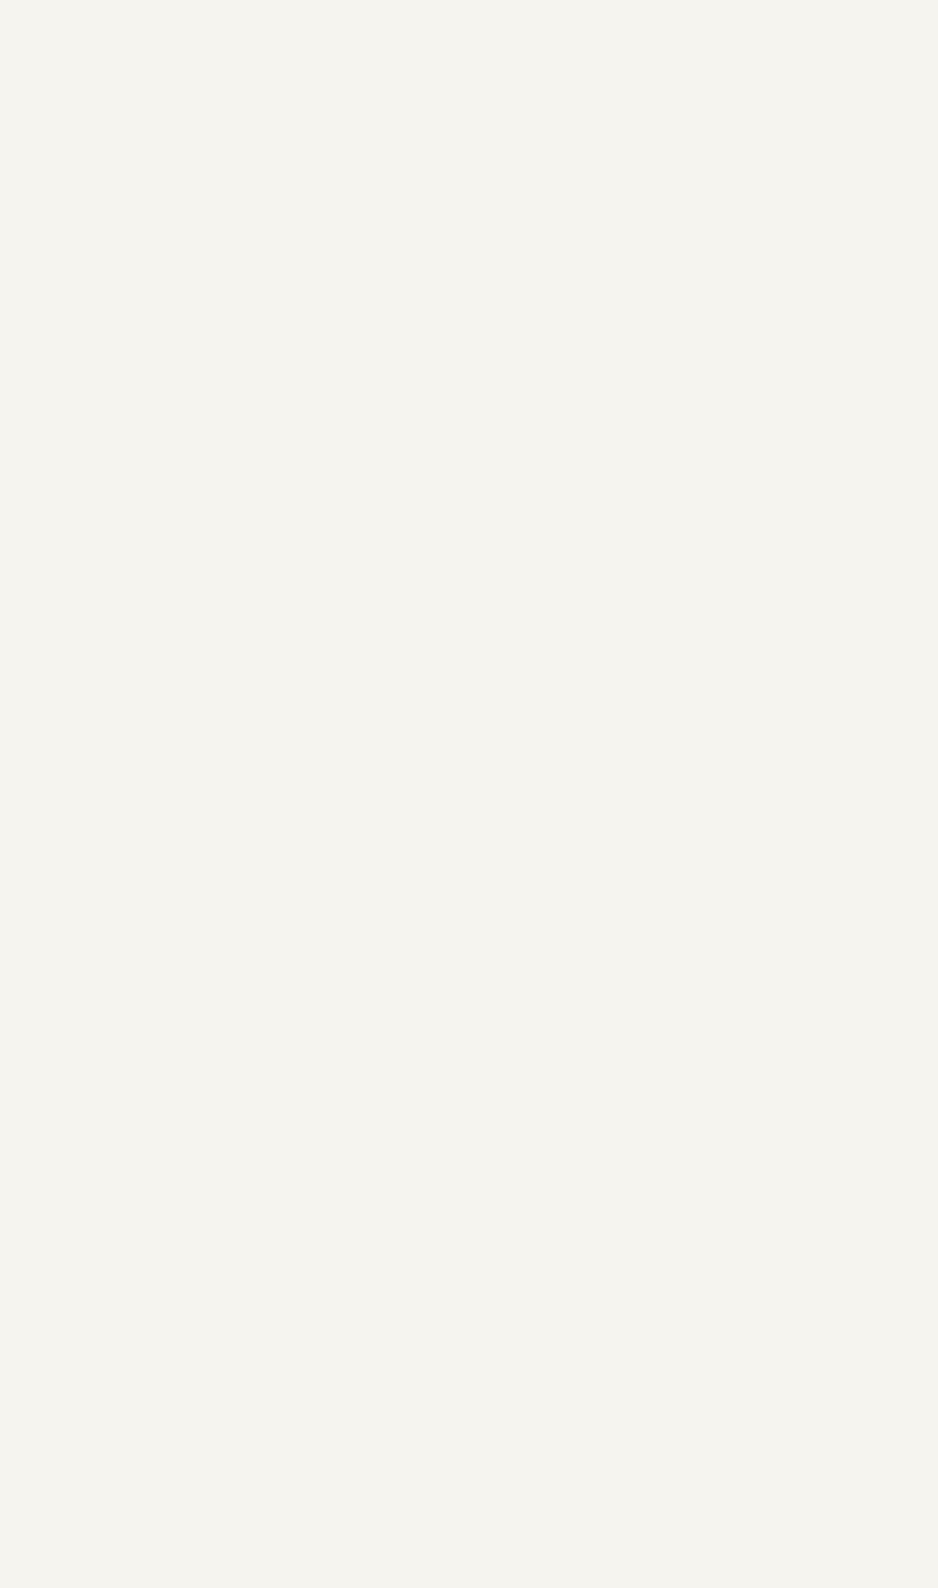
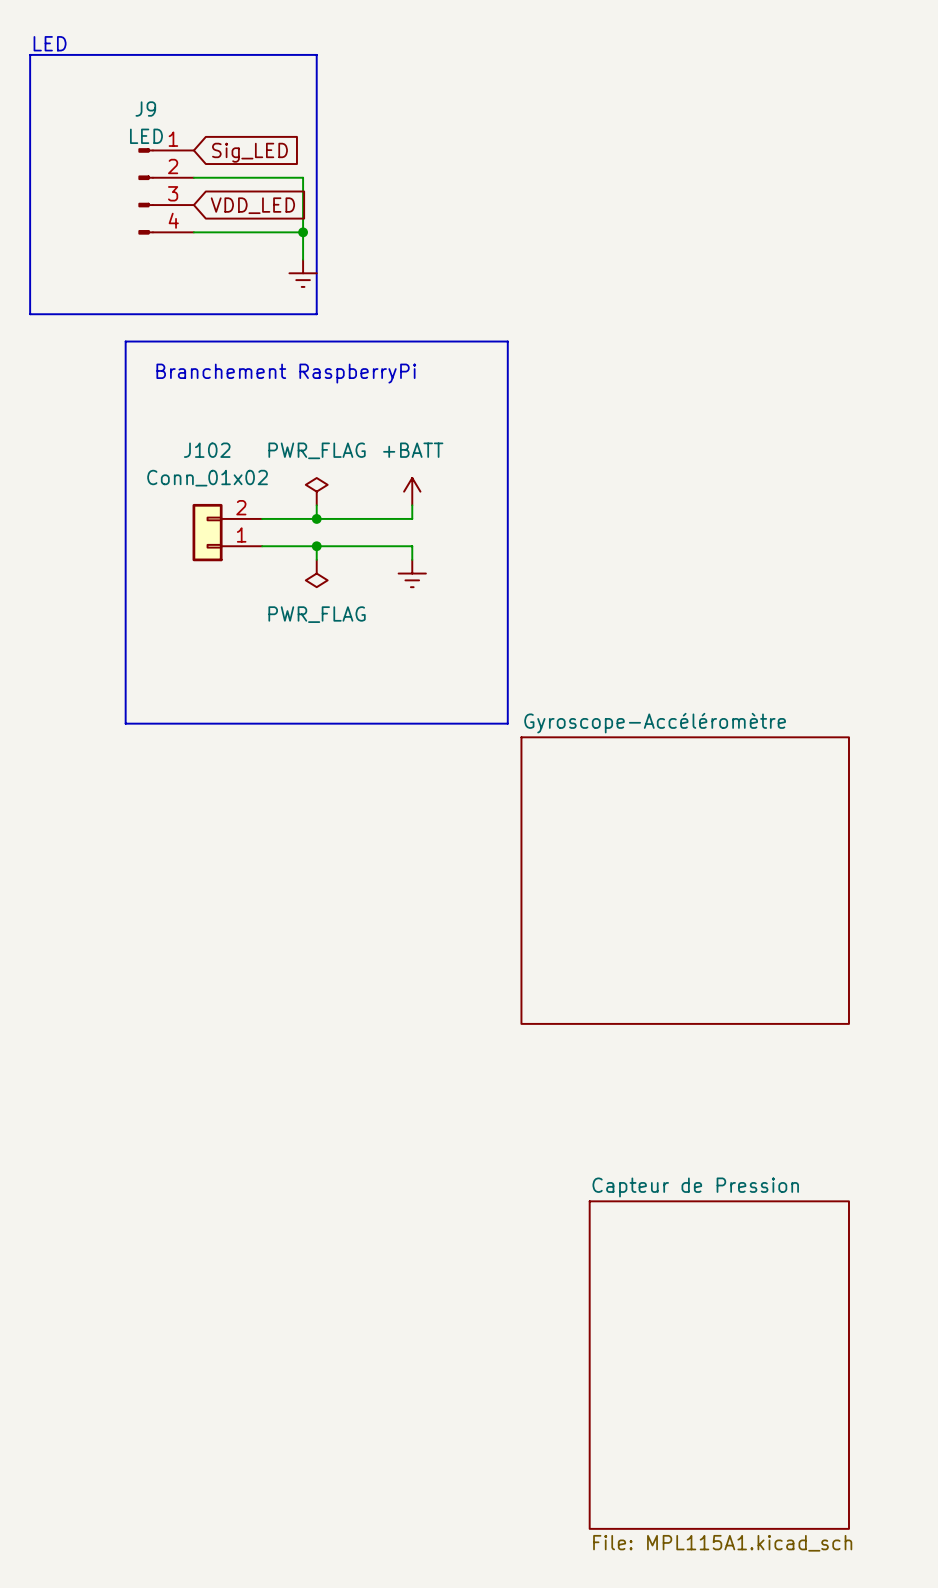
text: none -> LED (50, 43)
line: none -> (30, 54) (316, 54) (316, 314) (30, 314) (30, 54)
global label: none -> Sig_LED (249, 152)
wire: none -> (193, 177) (303, 177) (303, 259)
J9: none -> LED (166, 191)
global label: none -> VDD_LED (252, 205)
wire: none -> (193, 232) (303, 232)
junction: none -> (303, 232)
power symbol: none -> (303, 273)
line: none -> (125, 341) (507, 341) (507, 723) (125, 723) (125, 341)
text: none -> Branchement RaspberryPi (286, 373)
power symbol: none -> PWR_FLAG (316, 491)
power symbol: none -> +BATT (412, 491)
wire: none -> (316, 505) (316, 518)
wire: none -> (412, 505) (412, 518) (262, 518)
junction: none -> (316, 518)
J102: none -> Conn_01x02 (227, 532)
wire: none -> (262, 546) (412, 546) (412, 559)
wire: none -> (316, 546) (316, 559)
junction: none -> (316, 546)
power symbol: none -> PWR_FLAG (316, 573)
power symbol: none -> (412, 573)
sheet Gyroscope-Accéléromètre: none -> (685, 880)
sheet Capteur de Pression: none -> File: MPL115A1.kicad_sch (719, 1365)

